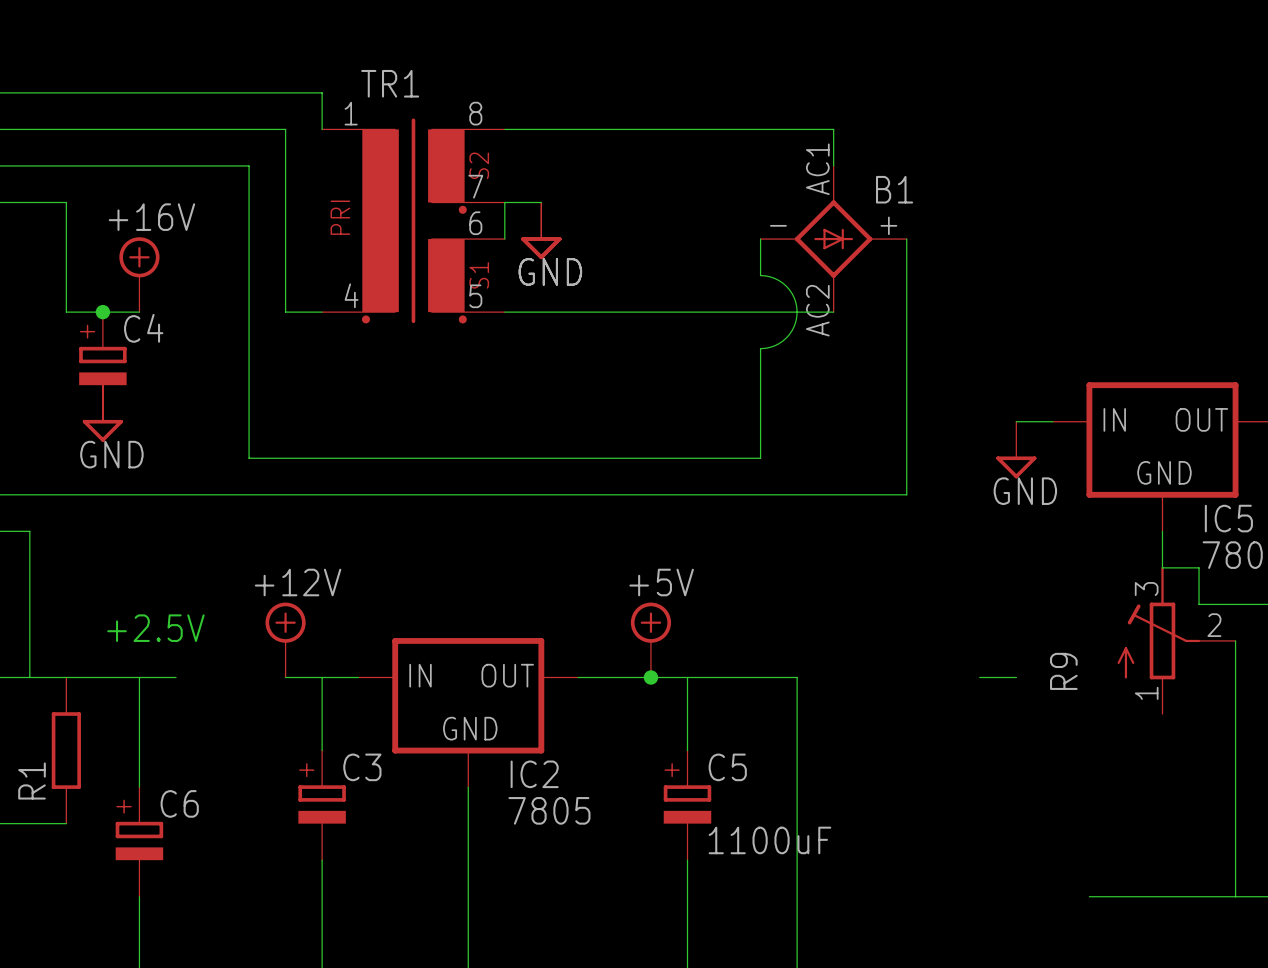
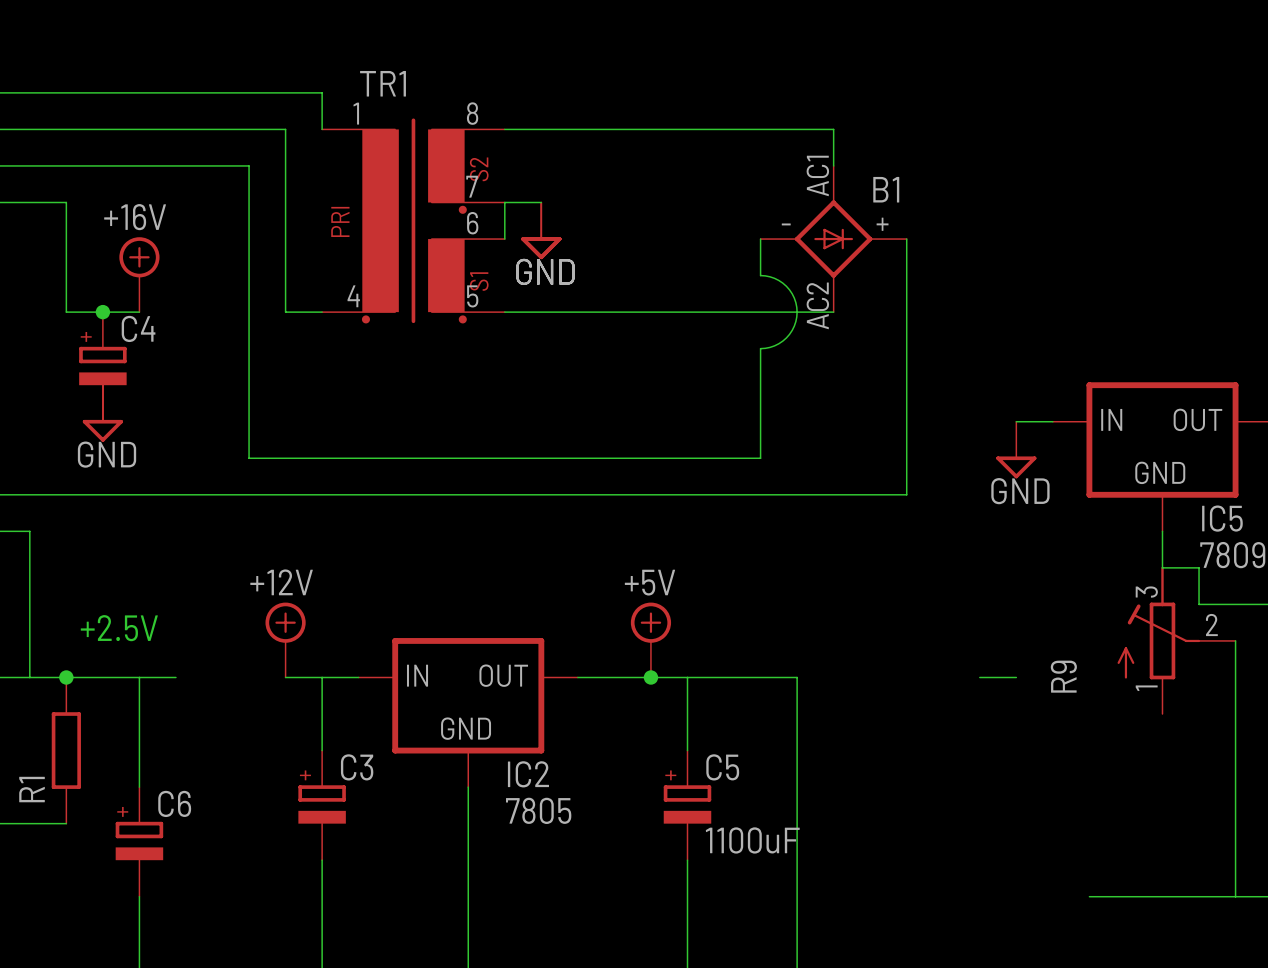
junction: none -> (66, 677)

